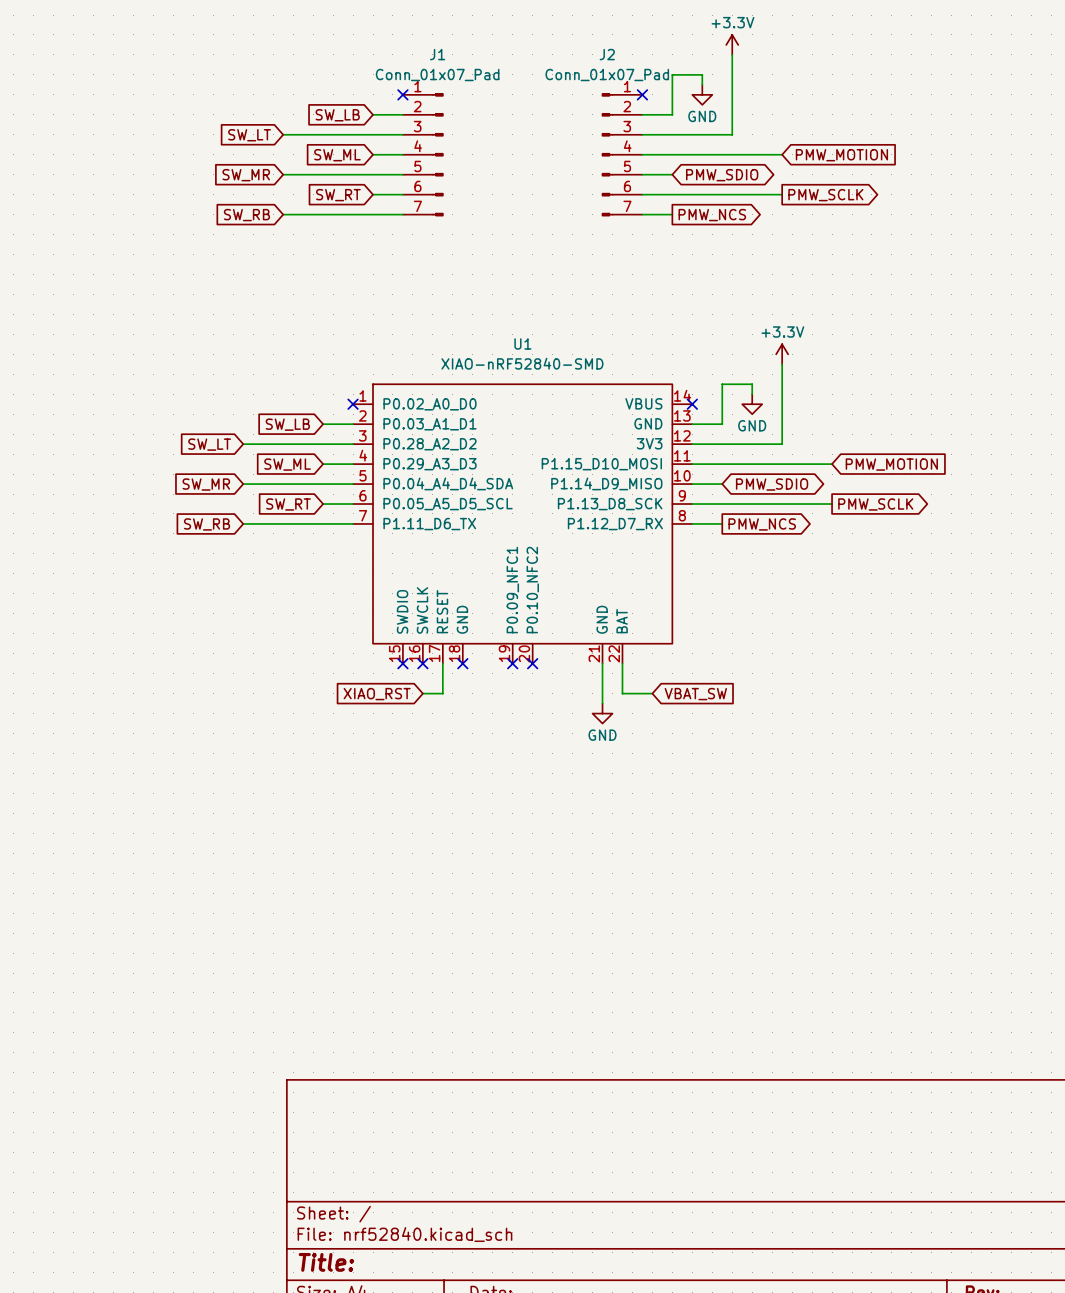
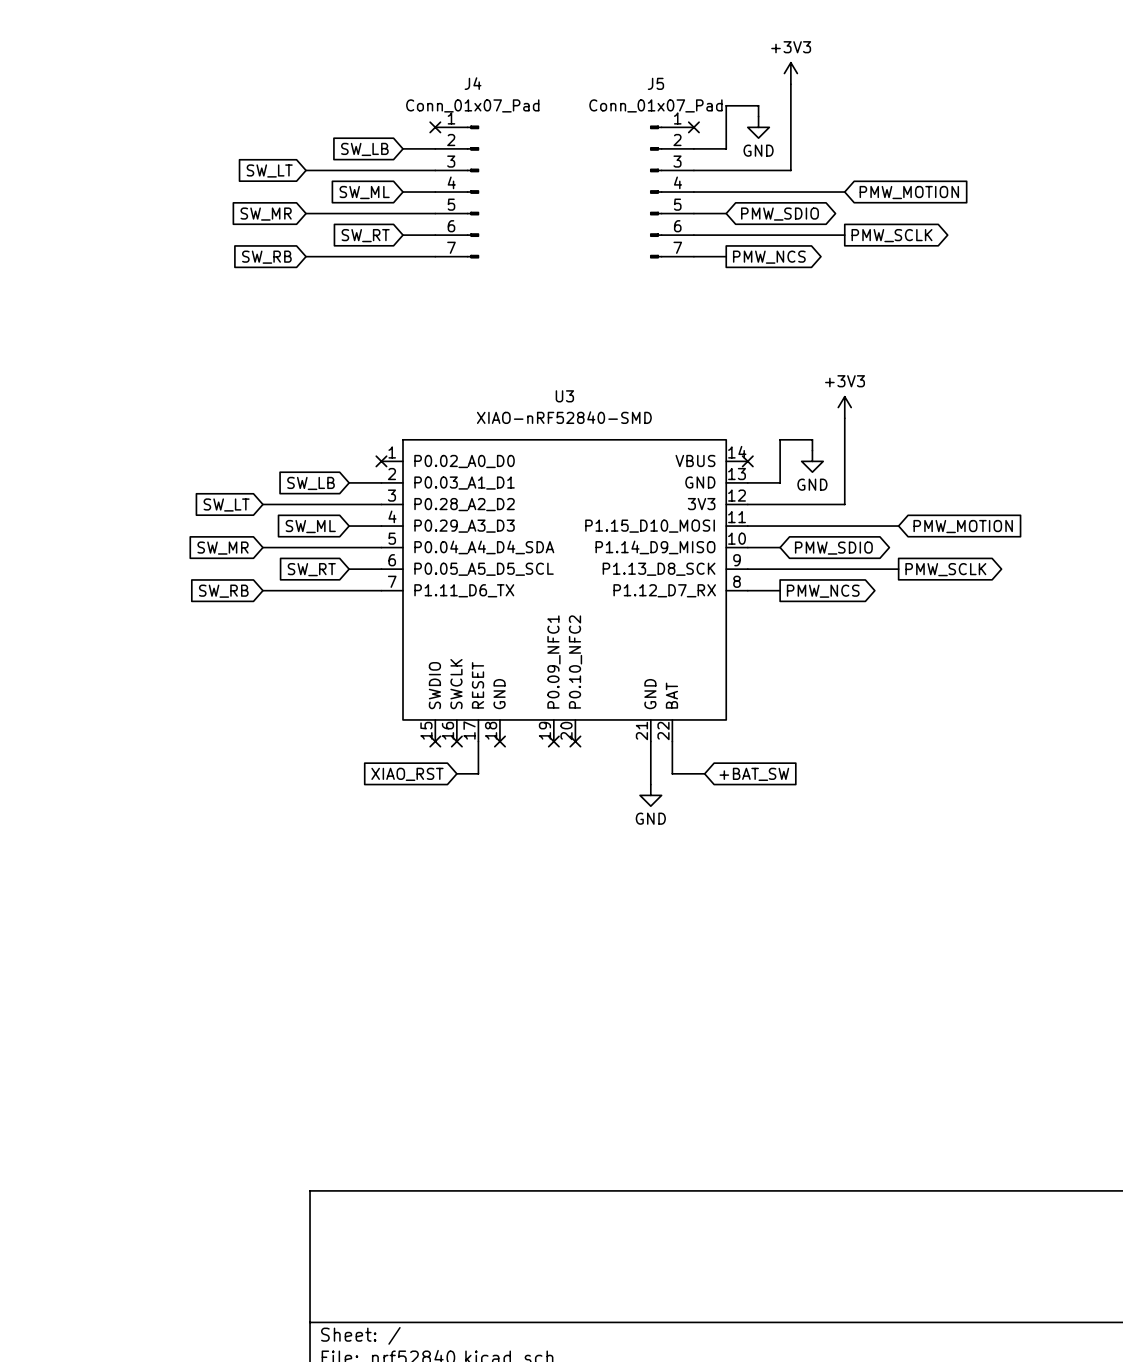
power symbol: +3.3V (732, 44) -> +3V3 (790, 73)
J1 name: J1 (437, 54) -> J4 (473, 83)
J2 name: J2 (607, 54) -> J5 (655, 83)
U1 name: U1 (522, 343) -> U3 (564, 396)
power symbol: +3.3V (782, 354) -> +3V3 (844, 407)
global label: VBAT_SW (695, 694) -> +BAT_SW (754, 774)

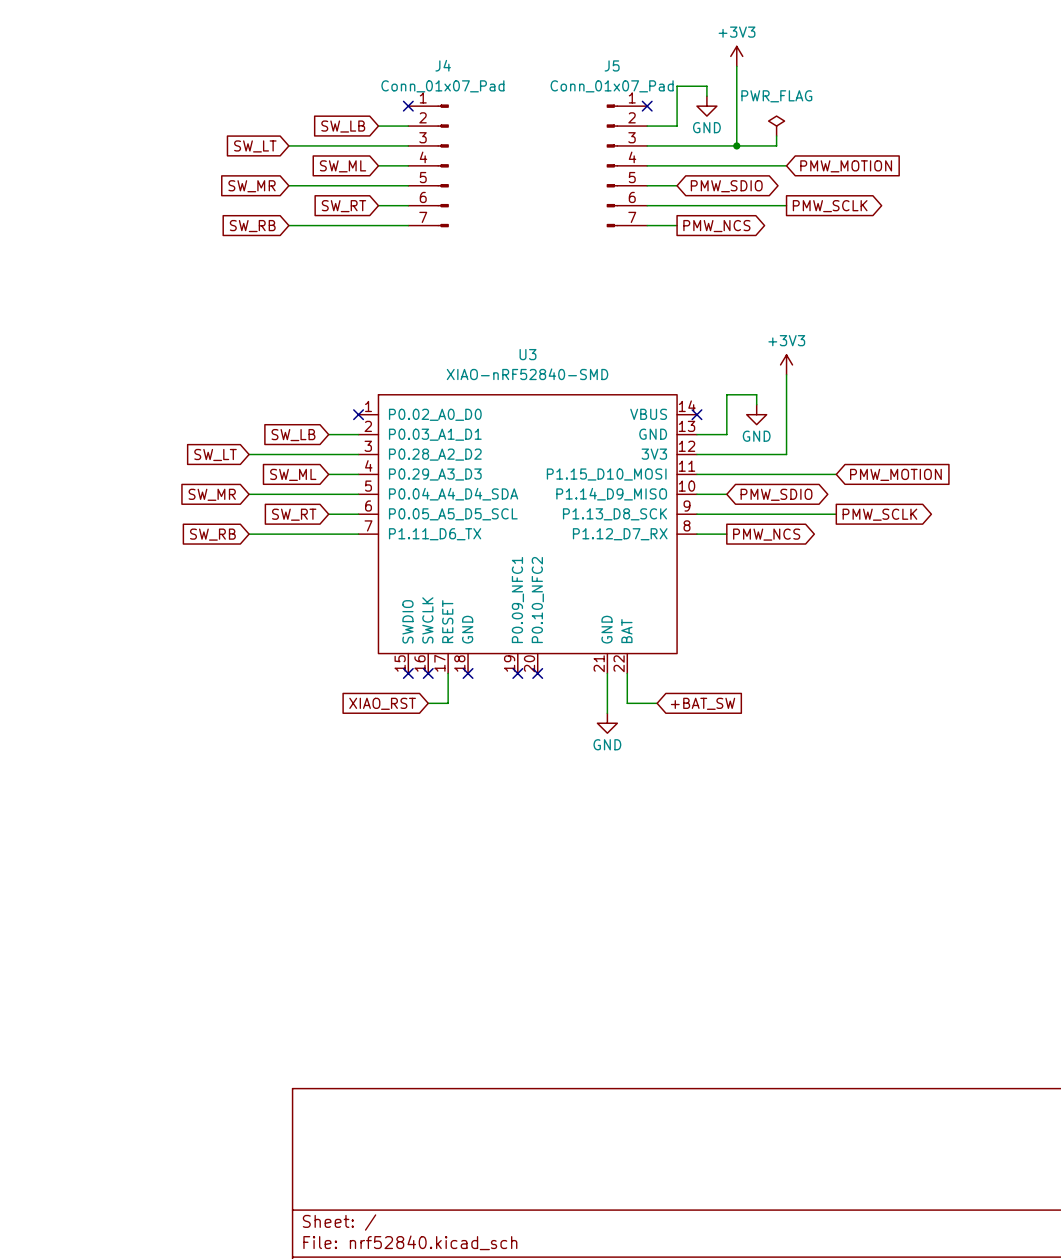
power symbol: none -> PWR_FLAG (776, 126)
wire: none -> (776, 136) (776, 145) (736, 145)
junction: none -> (736, 145)

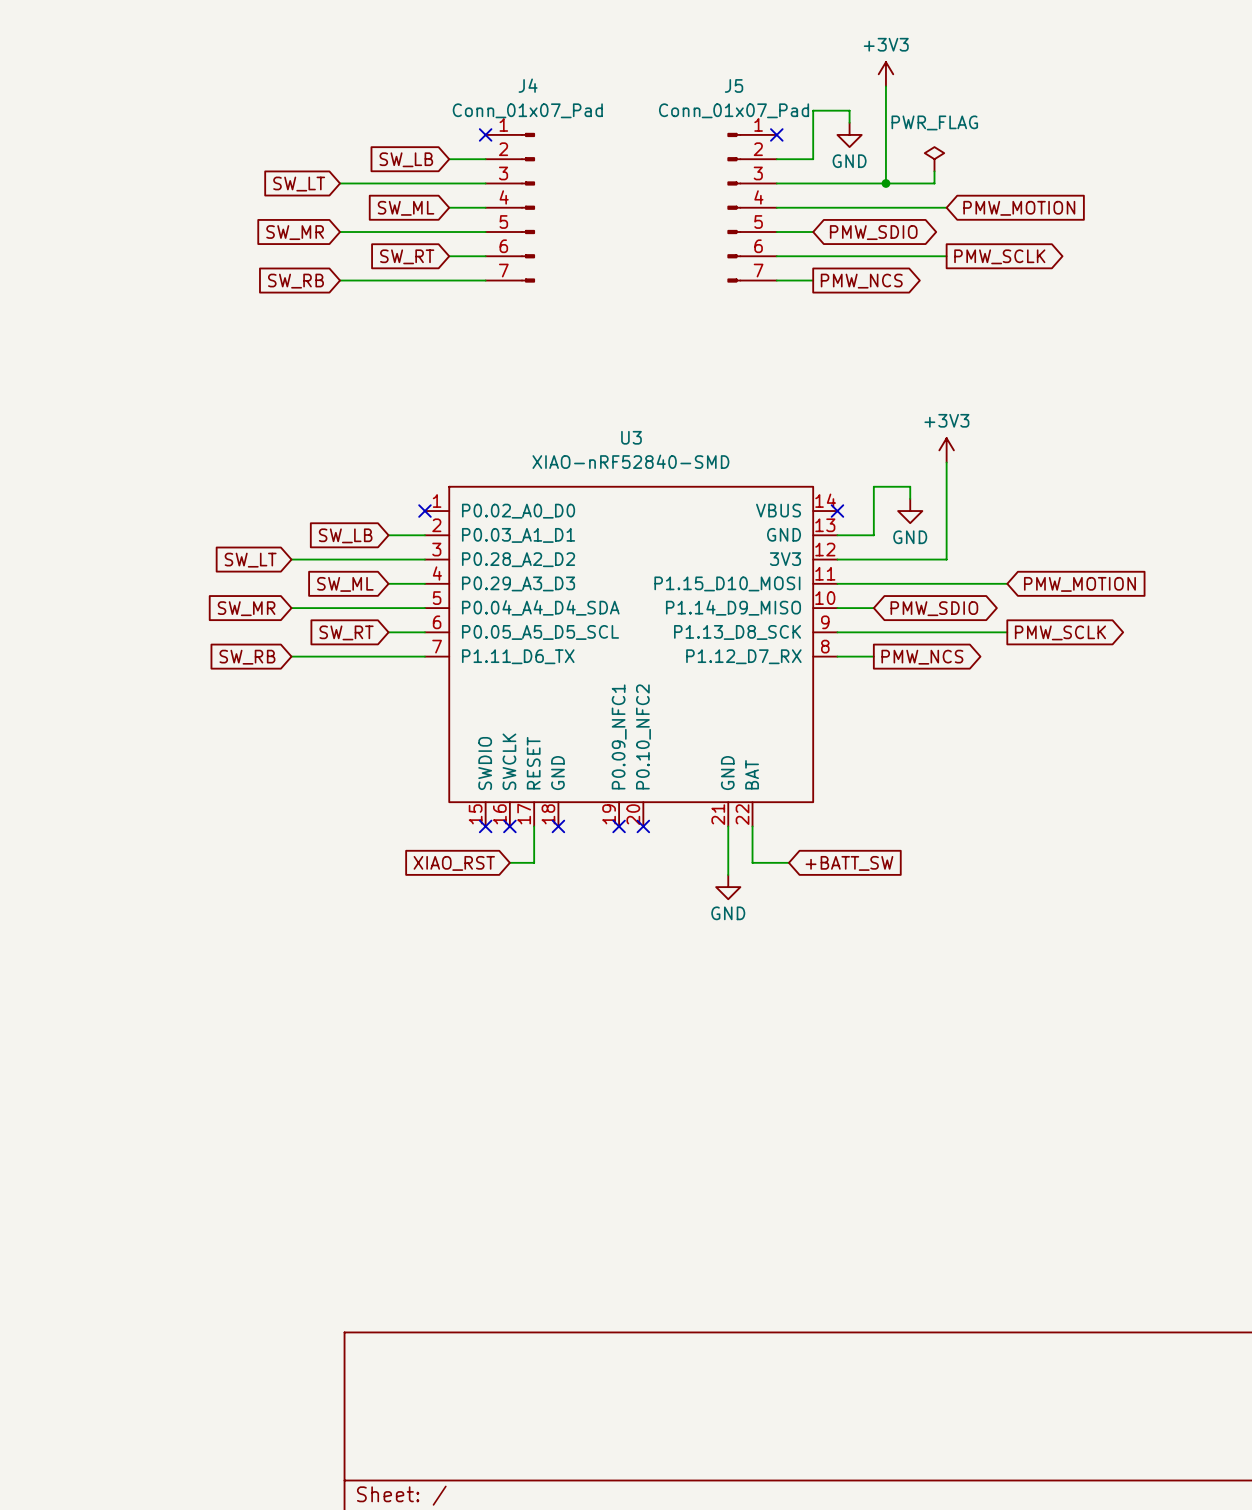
global label: +BAT_SW (703, 703) -> +BATT_SW (849, 863)

